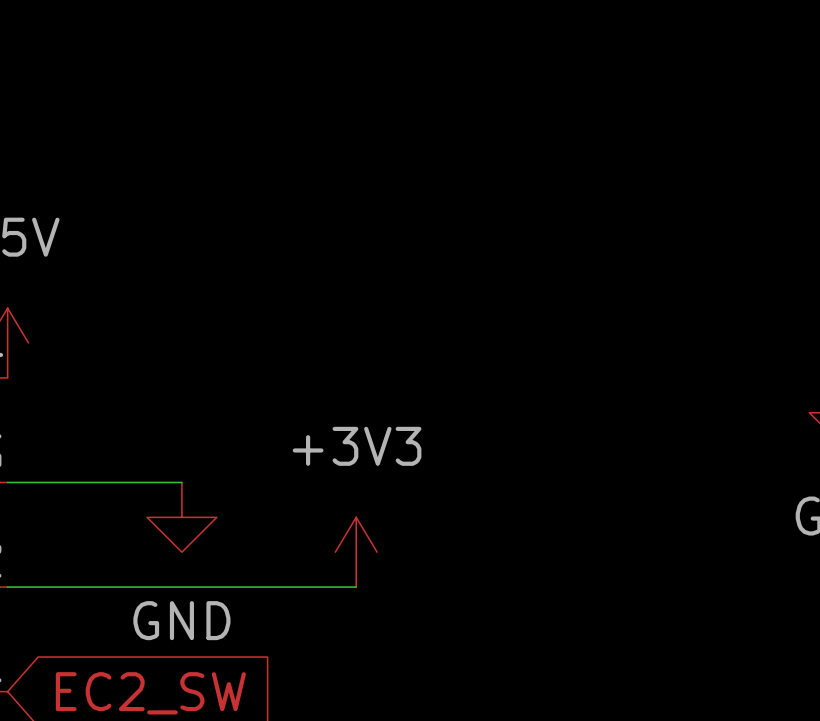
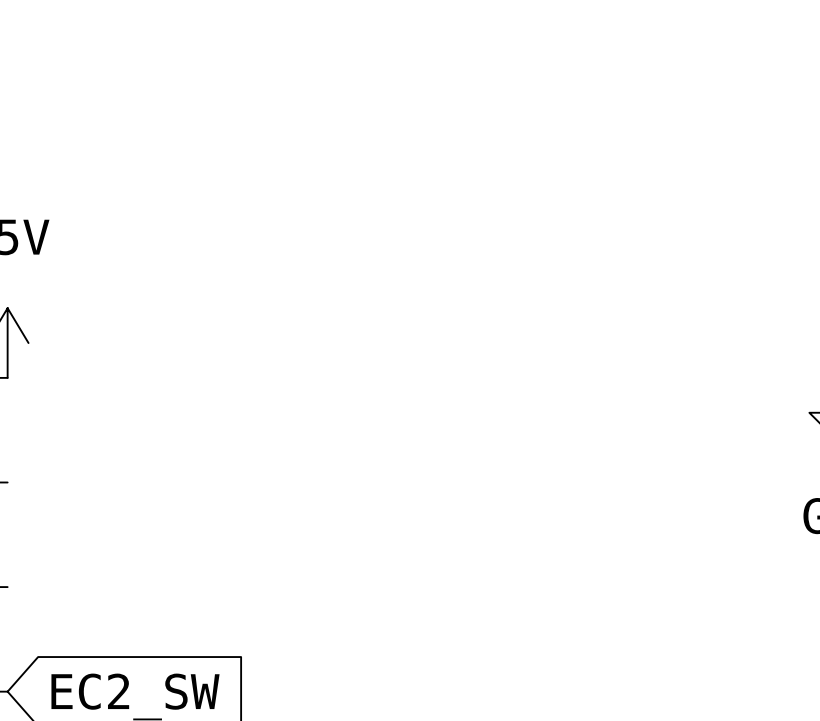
wire: (7, 482) (181, 482) -> none
power symbol: GND (181, 517) -> none
power symbol: +3V3 (356, 552) -> none
wire: (7, 587) (356, 587) -> none

